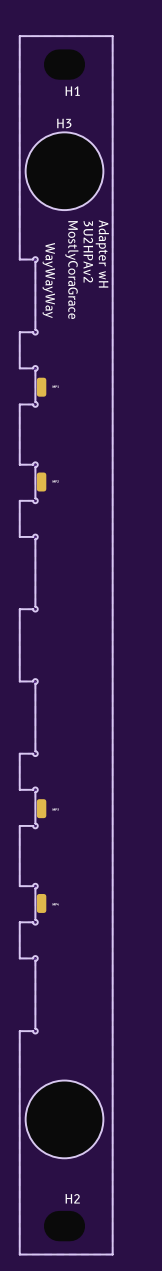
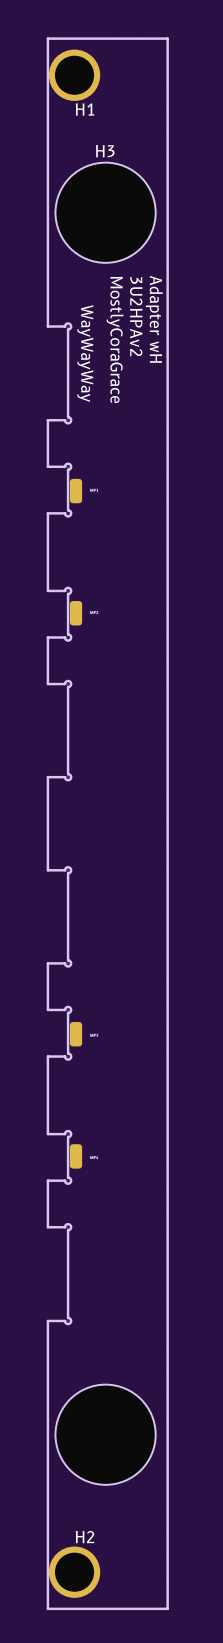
H1 footprint: [43, 49, 86, 80] -> [48, 49, 101, 101]
H2 footprint: [43, 1210, 86, 1242] -> [48, 1546, 101, 1598]

